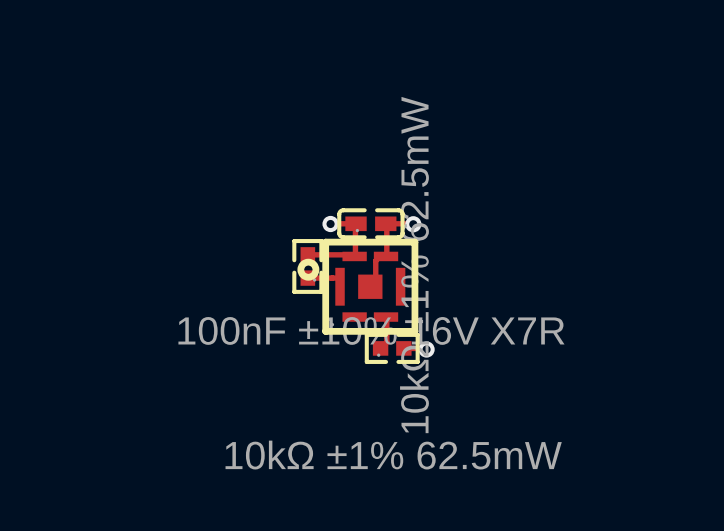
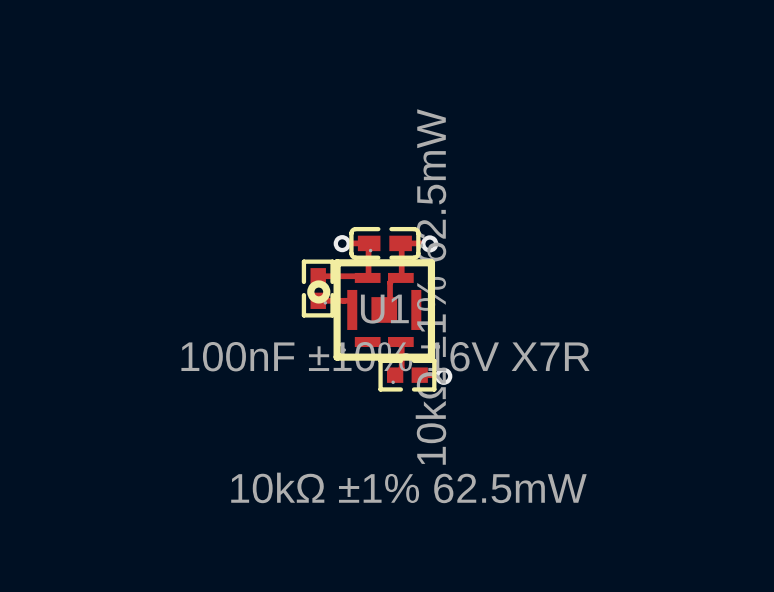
U1 name: none -> U1 (384, 309)

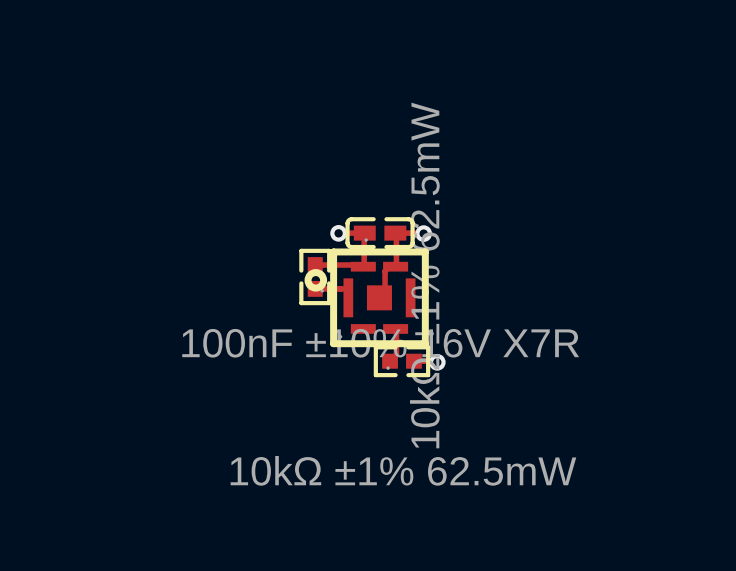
U1 name: U1 (384, 309) -> none

